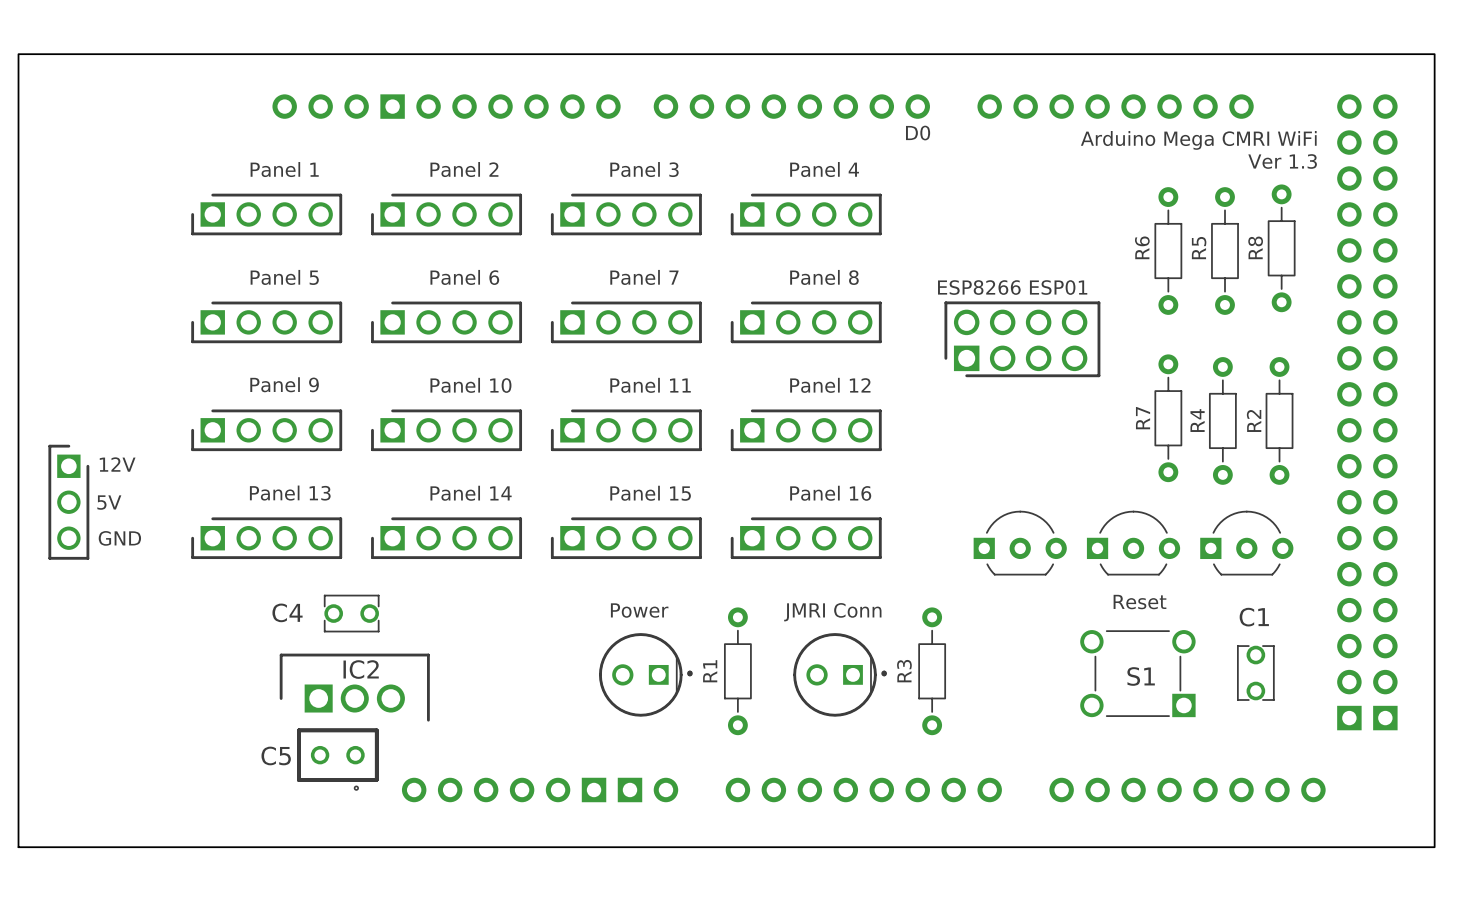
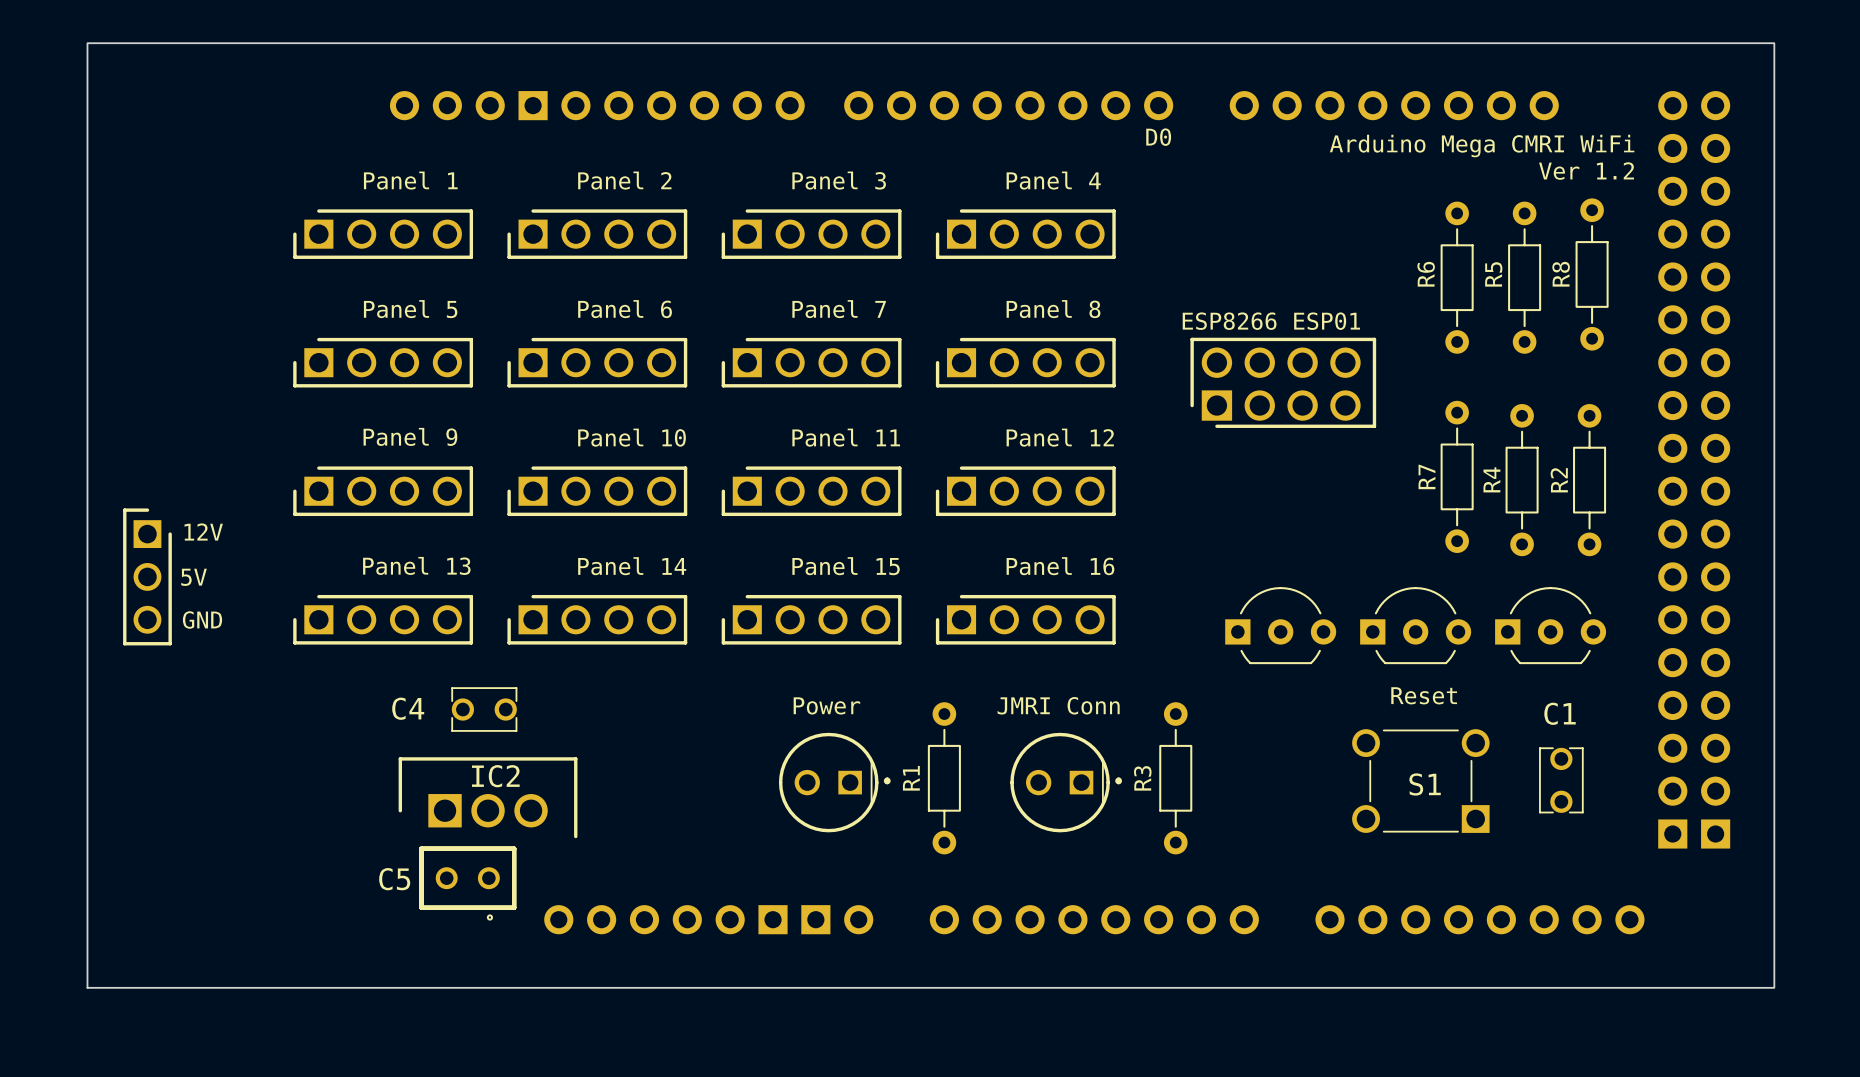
text: Ver 1.3 (1282, 161) -> Ver 1.2 (1586, 171)

